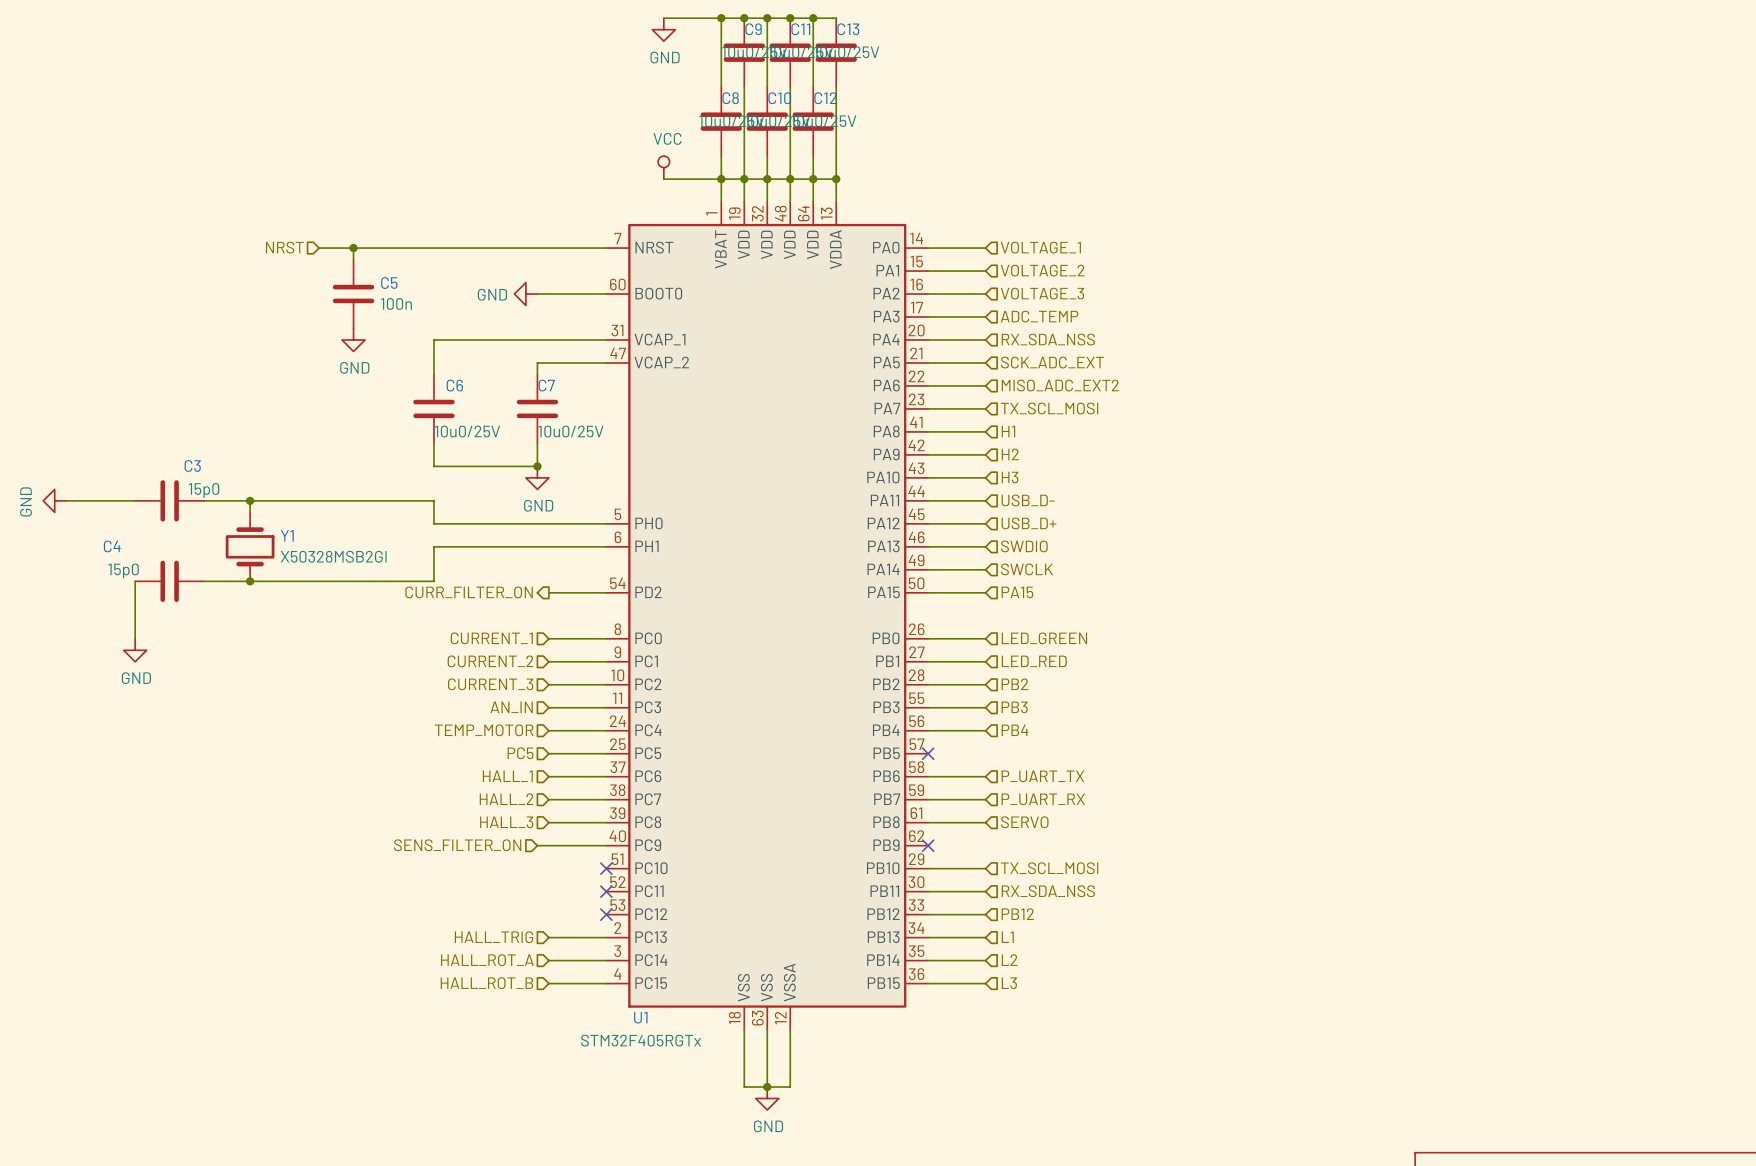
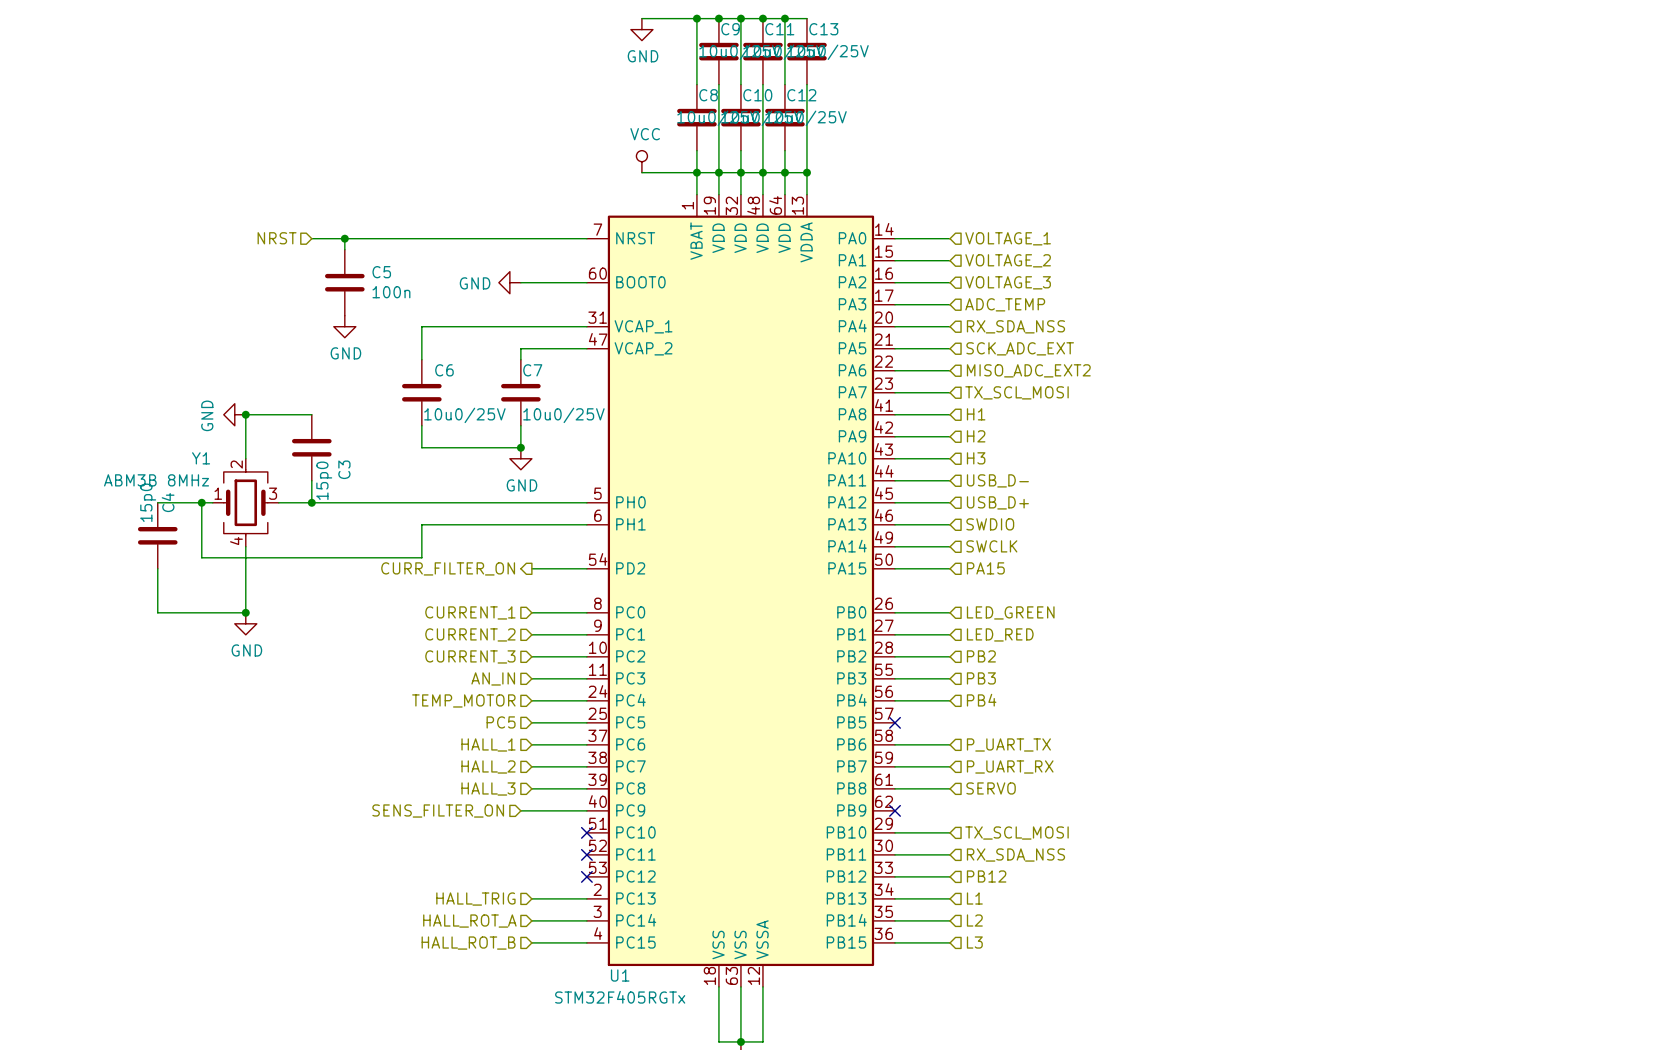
power symbol: none -> GND (234, 414)
junction: none -> (245, 414)
wire: none -> (311, 414) (245, 414) (245, 458)
power symbol: GND (54, 500) -> none
wire: (66, 500) (135, 500) -> none
C3 rotation: 0° (169, 500) -> 90° clockwise (311, 447)
C3 position: (169, 500) -> (311, 447)
wire: (204, 500) (433, 500) (433, 523) -> (278, 502) (421, 502)
wire: (250, 500) (250, 512) -> none
junction: (250, 500) -> none
wire: none -> (311, 480) (311, 502)
Y1 symbol: [225, 512, 275, 582] -> [212, 458, 279, 547]
wire: none -> (157, 502) (212, 502)
junction: none -> (201, 502)
junction: none -> (311, 502)
Y1 name position: Y1 (287, 535) -> Y1 (201, 458)
C4 name position: C4 (112, 546) -> C4 (168, 502)
Y1 value: X50328MSB2GI (333, 556) -> ABM3B 8MHz (156, 480)
wire: none -> (245, 546) (245, 612) (157, 612) (157, 568)
C4 value position: 15p0 (123, 570) -> 15p0 (148, 502)
wire: (135, 581) (135, 638) -> (201, 502) (201, 557)
C4 rotation: 0° (169, 581) -> 90° clockwise (157, 535)
junction: (250, 581) -> none
junction: none -> (245, 612)
power symbol position: GND (135, 650) -> GND (245, 623)

